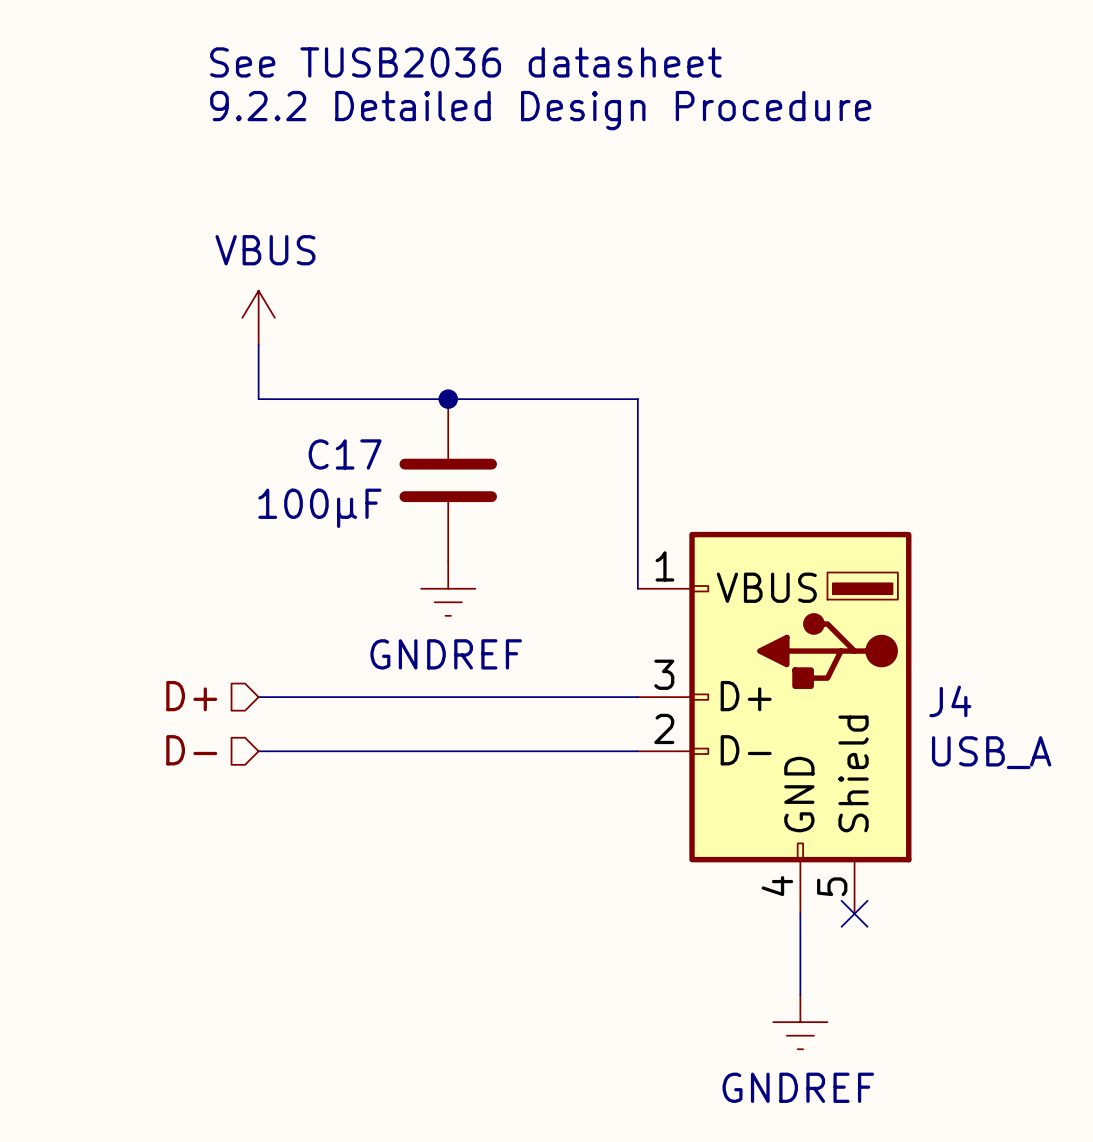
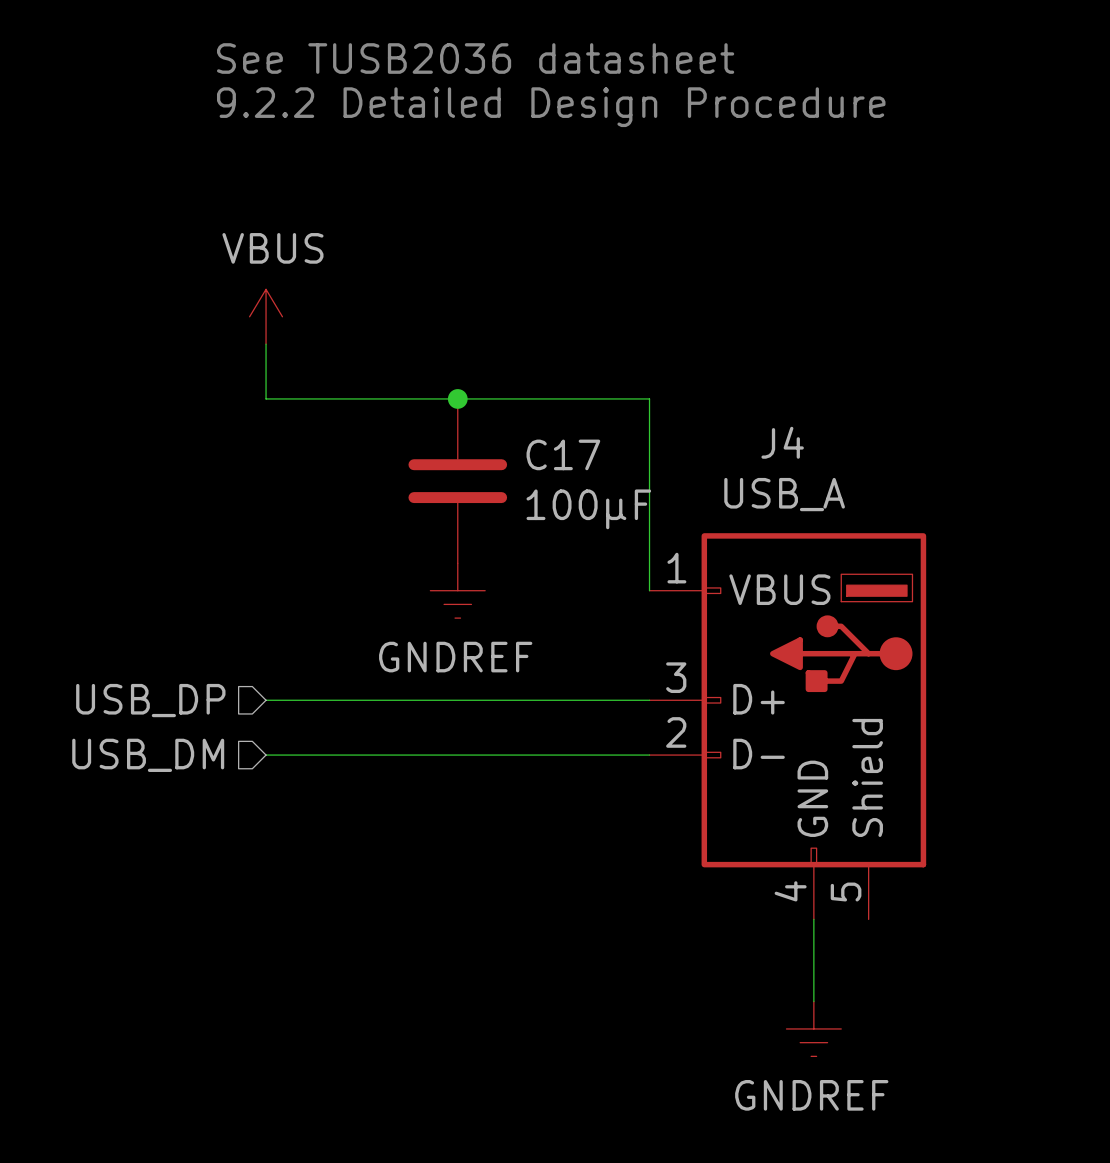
C17 name position: C17 (345, 454) -> C17 (563, 454)
C17 value position: 100μF (319, 508) -> 100μF (588, 509)
hierarchical label: D+ (191, 696) -> USB_DP (150, 700)
J4 name position: J4 (950, 701) -> J4 (782, 442)
hierarchical label: D- (191, 750) -> USB_DM (148, 755)
J4 value position: USB_A (991, 752) -> USB_A (784, 494)
no-connect mark: (854, 913) -> none

